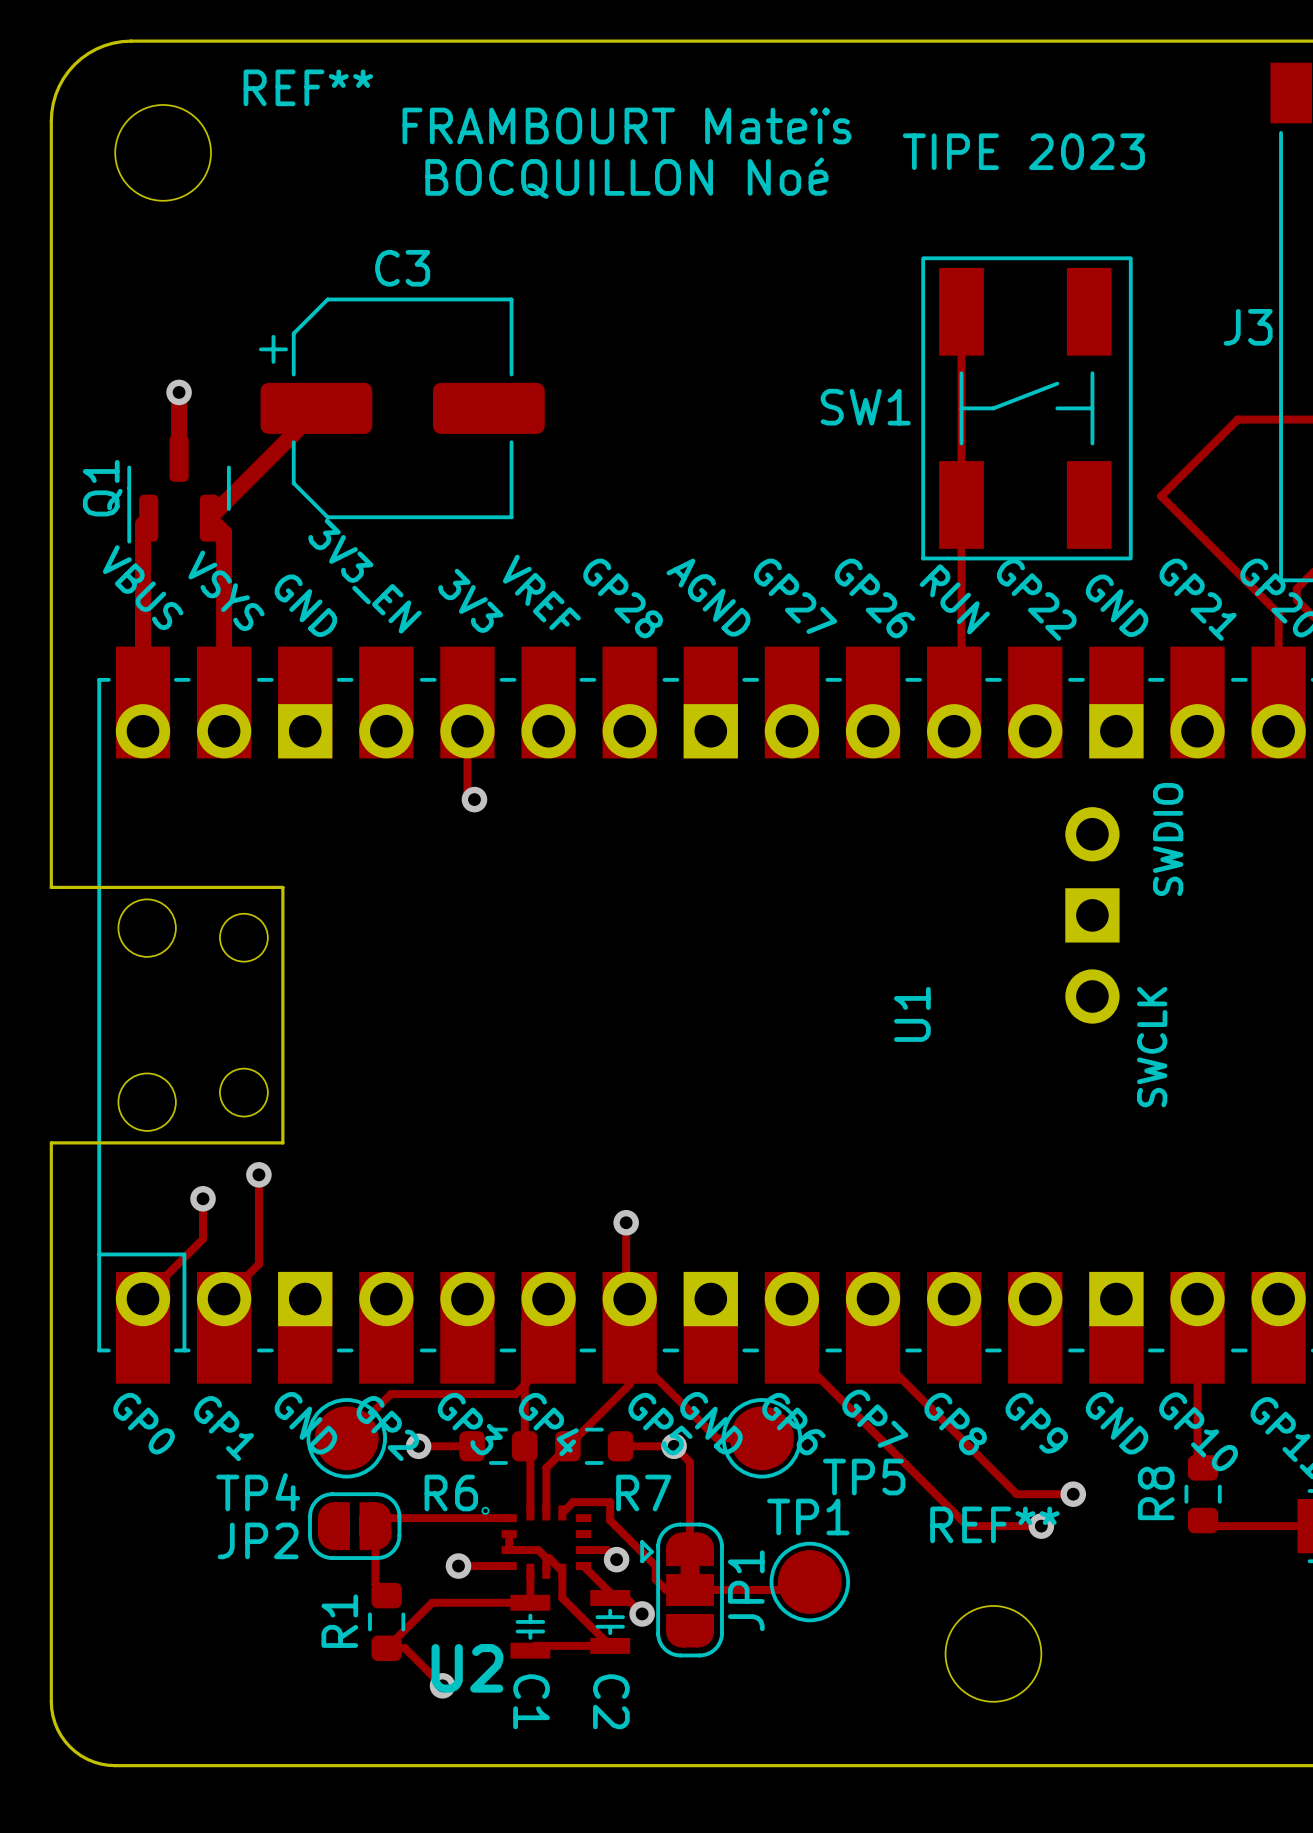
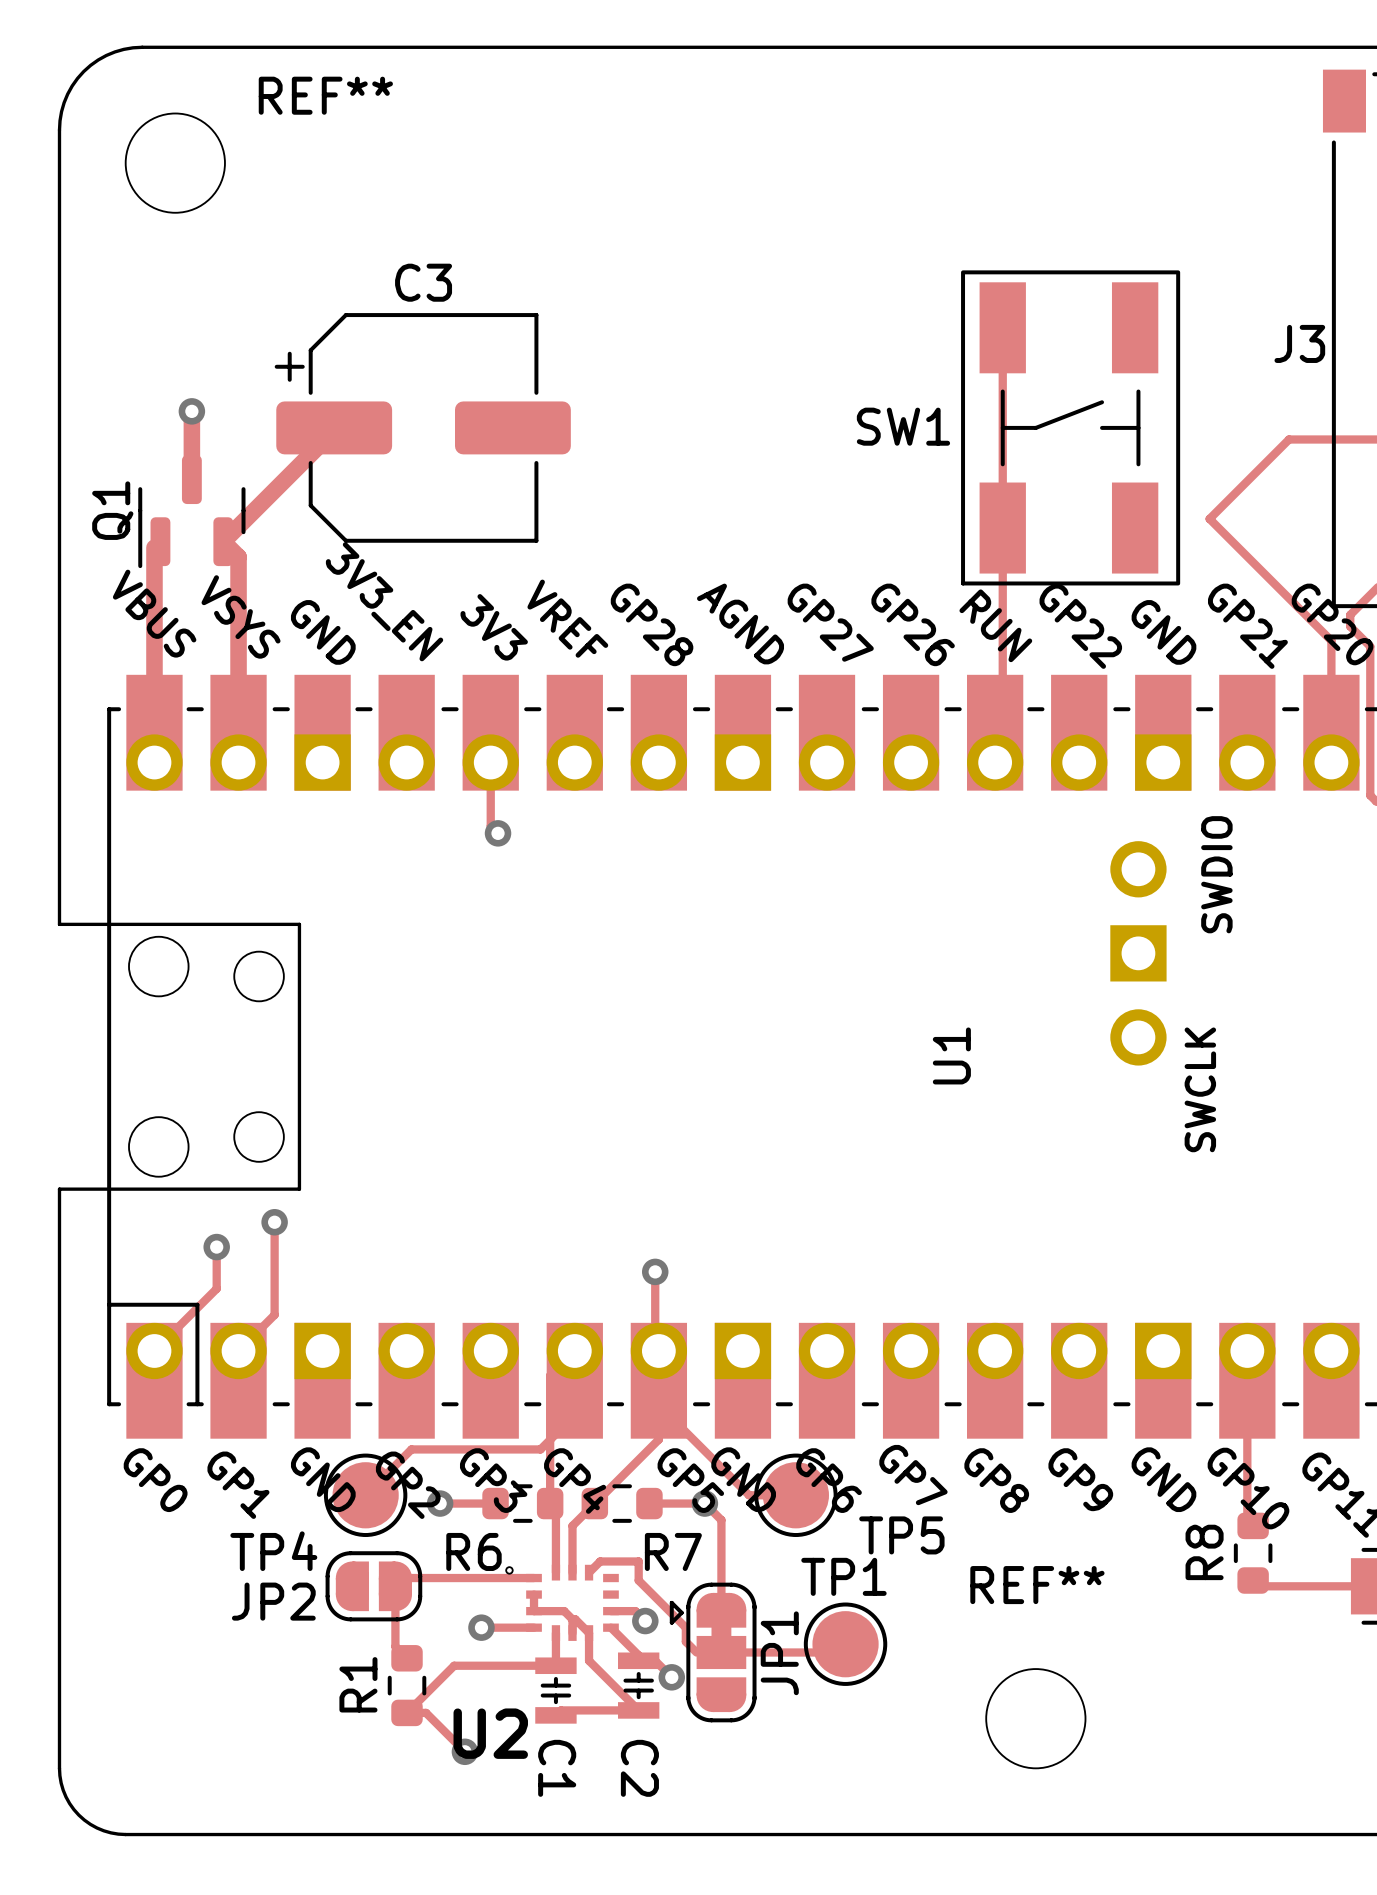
text: FRAMBOURT Mateïs (626, 125) -> none
text: TIPE 2023 (1023, 151) -> none
text: BOCQUILLON Noé (626, 178) -> none
track: (791, 1299) (791, 1350) (967, 1526) (1041, 1526) -> none
track: (873, 1299) (873, 1350) (1016, 1494) (1073, 1494) -> none
via: (1073, 1494) -> none
via: (1041, 1526) -> none

